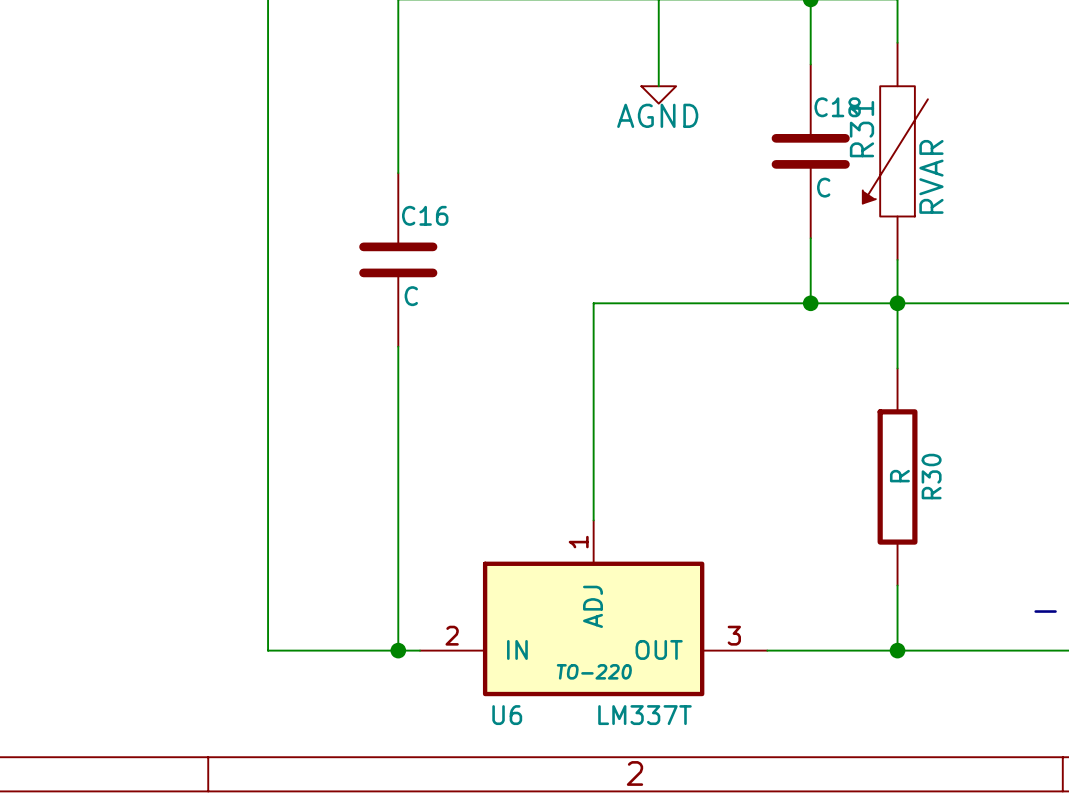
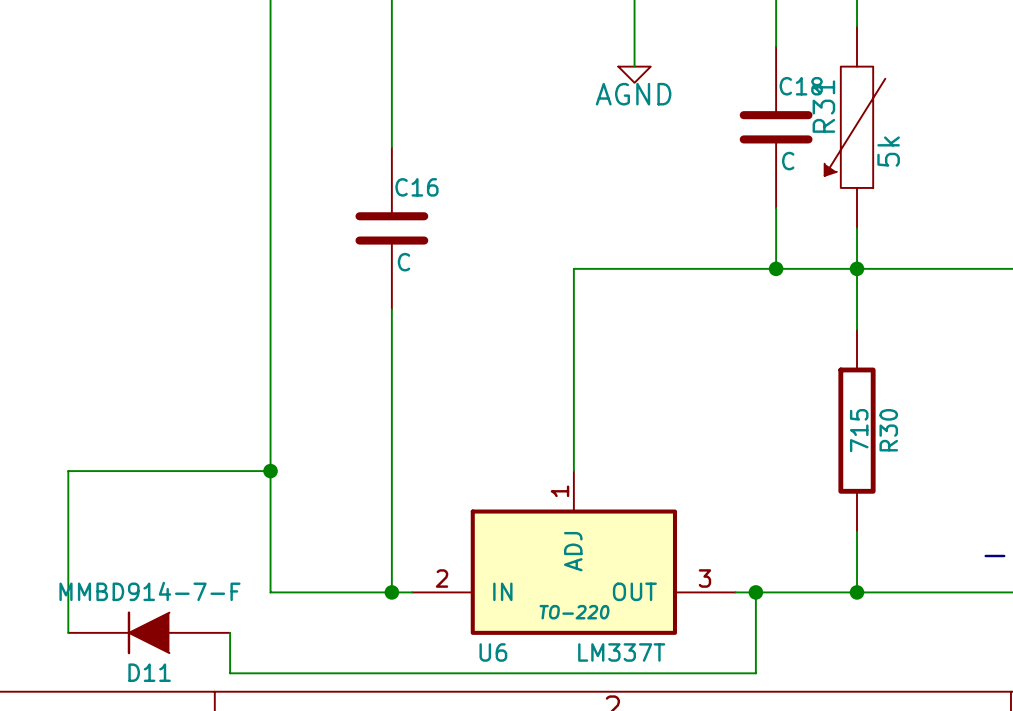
R31 value: RVAR (931, 176) -> 5k (888, 151)
R30 value: R (899, 476) -> 715 (859, 430)
wire: none -> (270, 471) (68, 471) (68, 632)
junction: none -> (270, 471)
wire: none -> (755, 592) (755, 673) (230, 673) (230, 632)
junction: none -> (755, 592)
D11: none -> MMBD914-7-F (149, 632)

